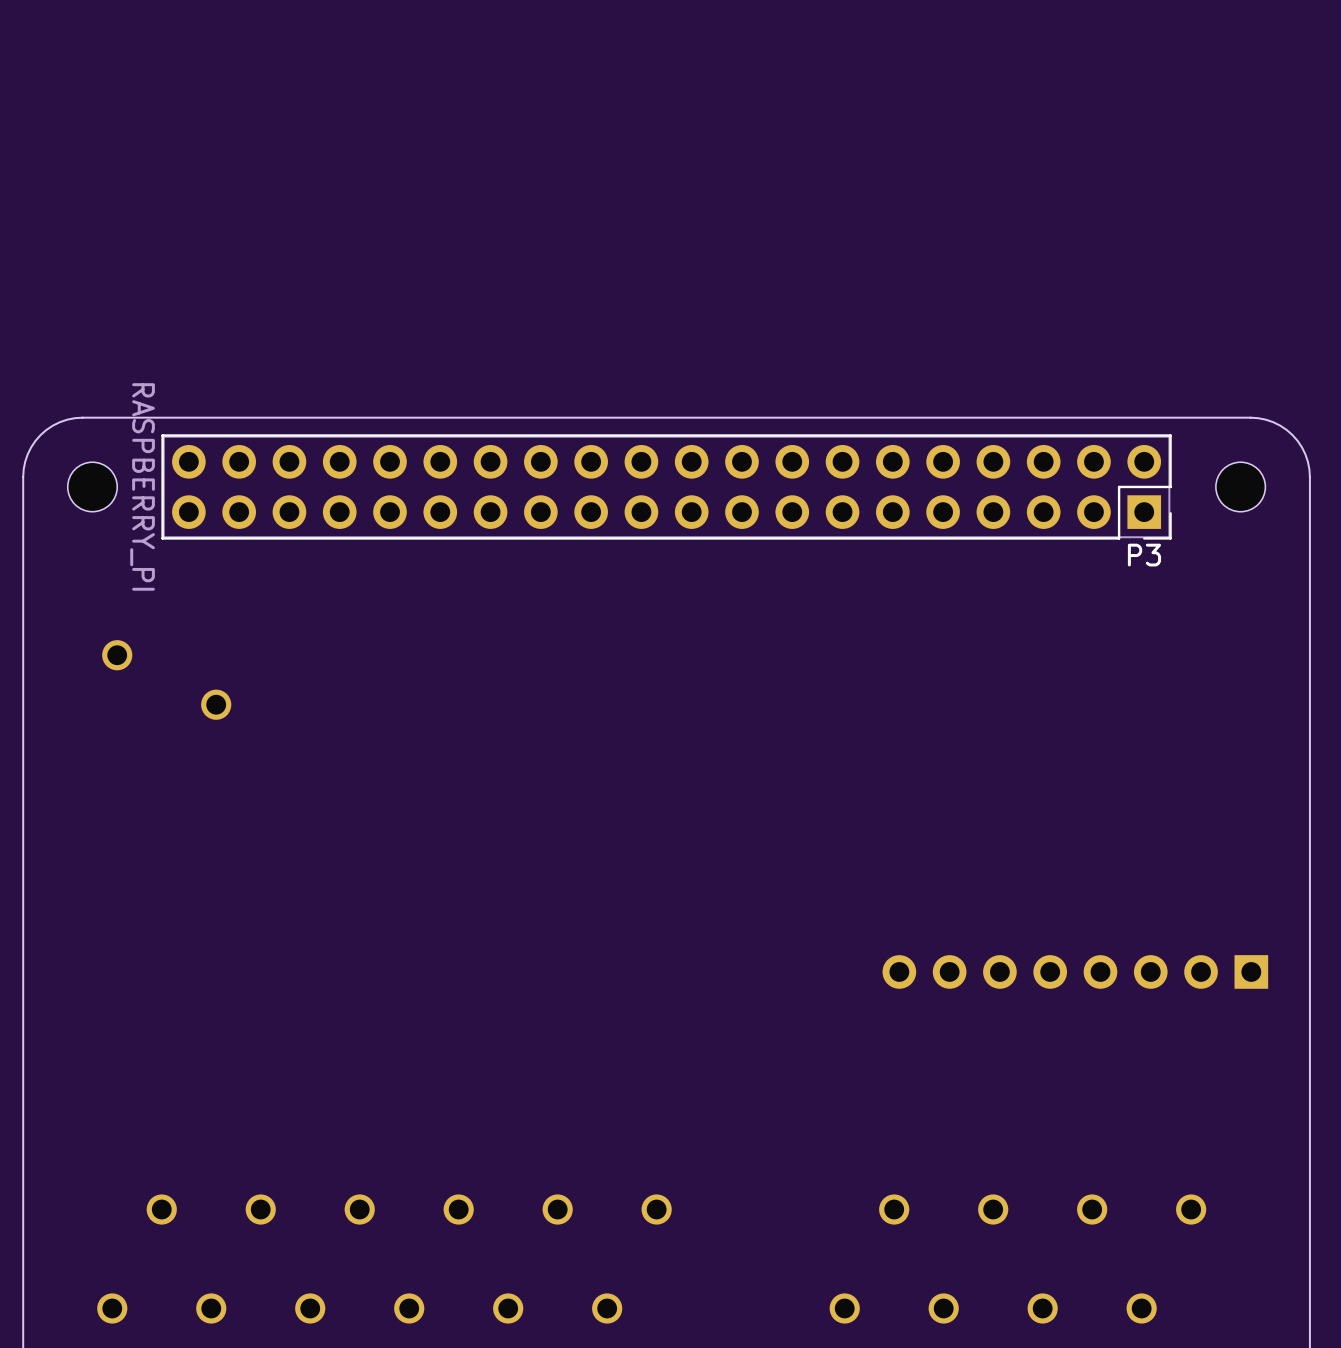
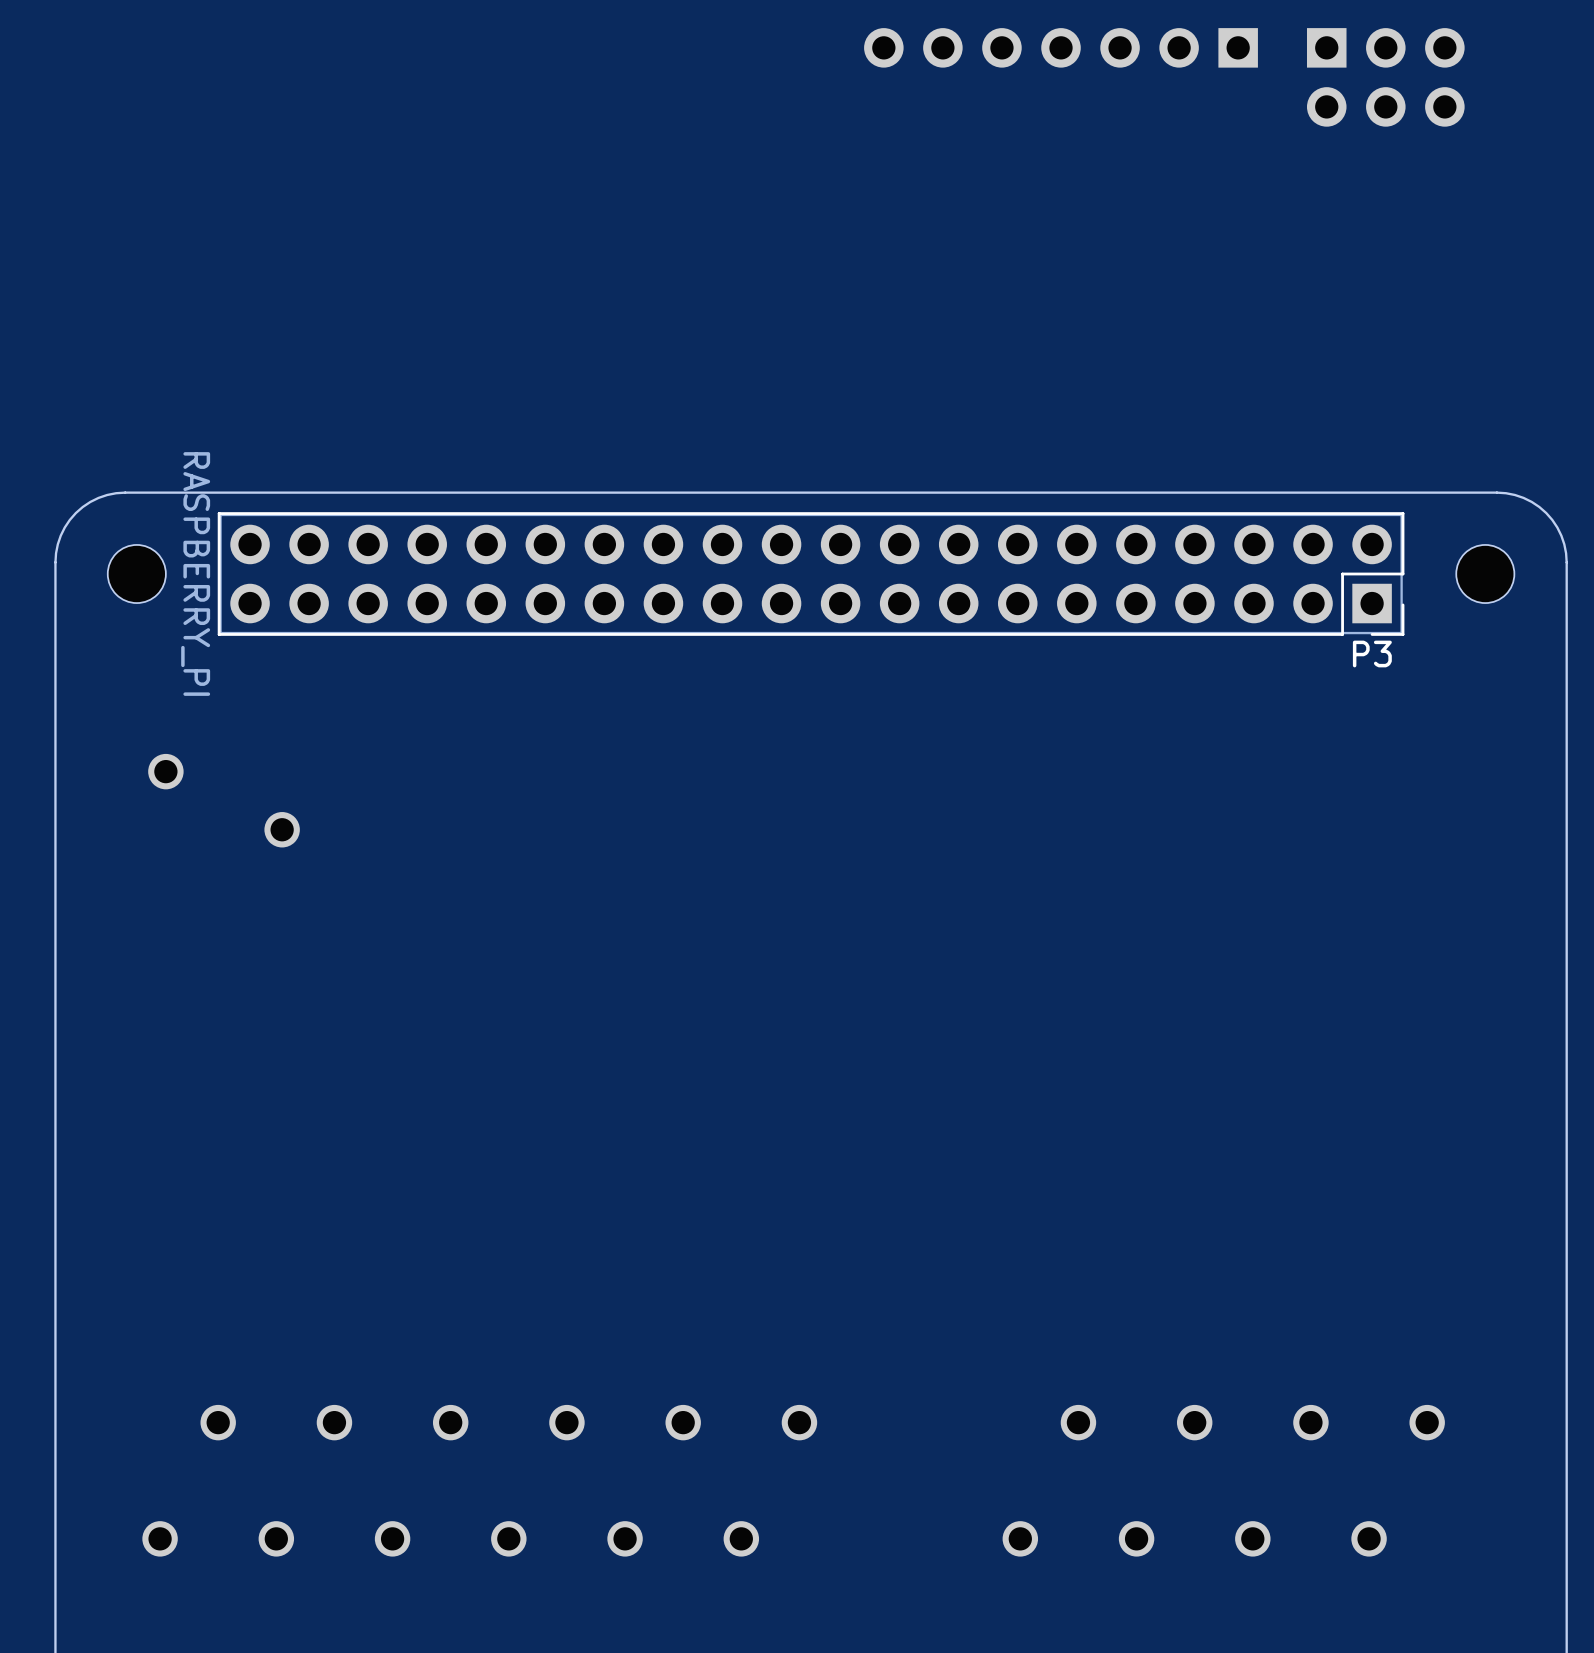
part: none -> (1061, 47)
part: none -> (1385, 77)
part: (1075, 971) -> none

